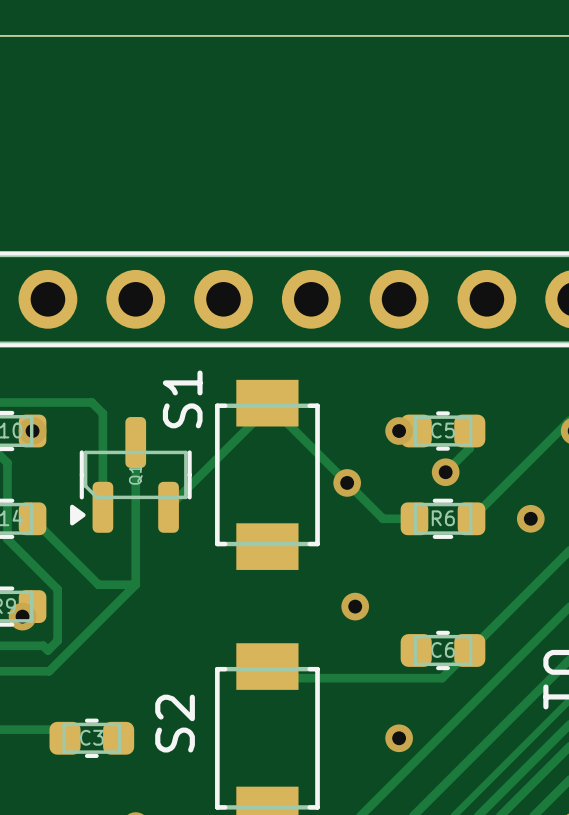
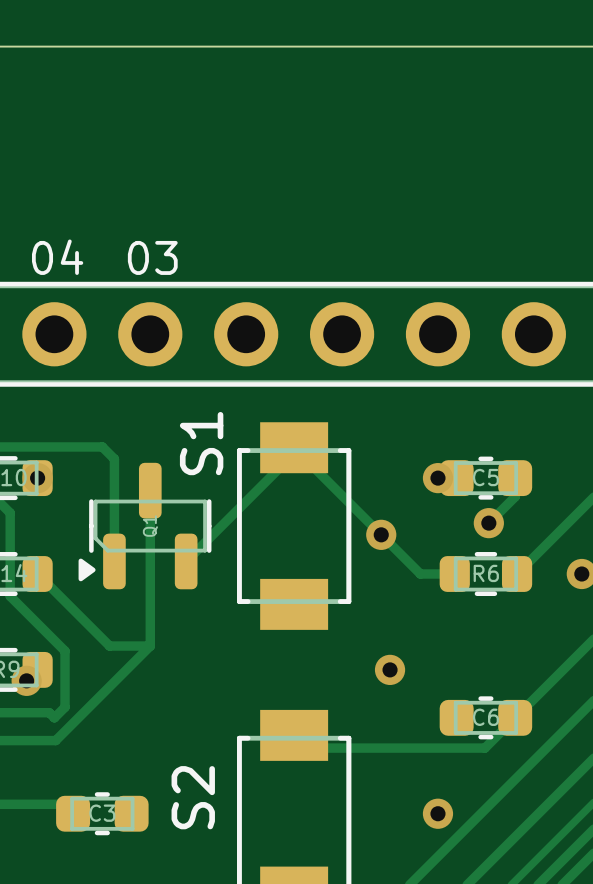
text: none -> 04 (57, 257)
text: none -> 03 (152, 257)

